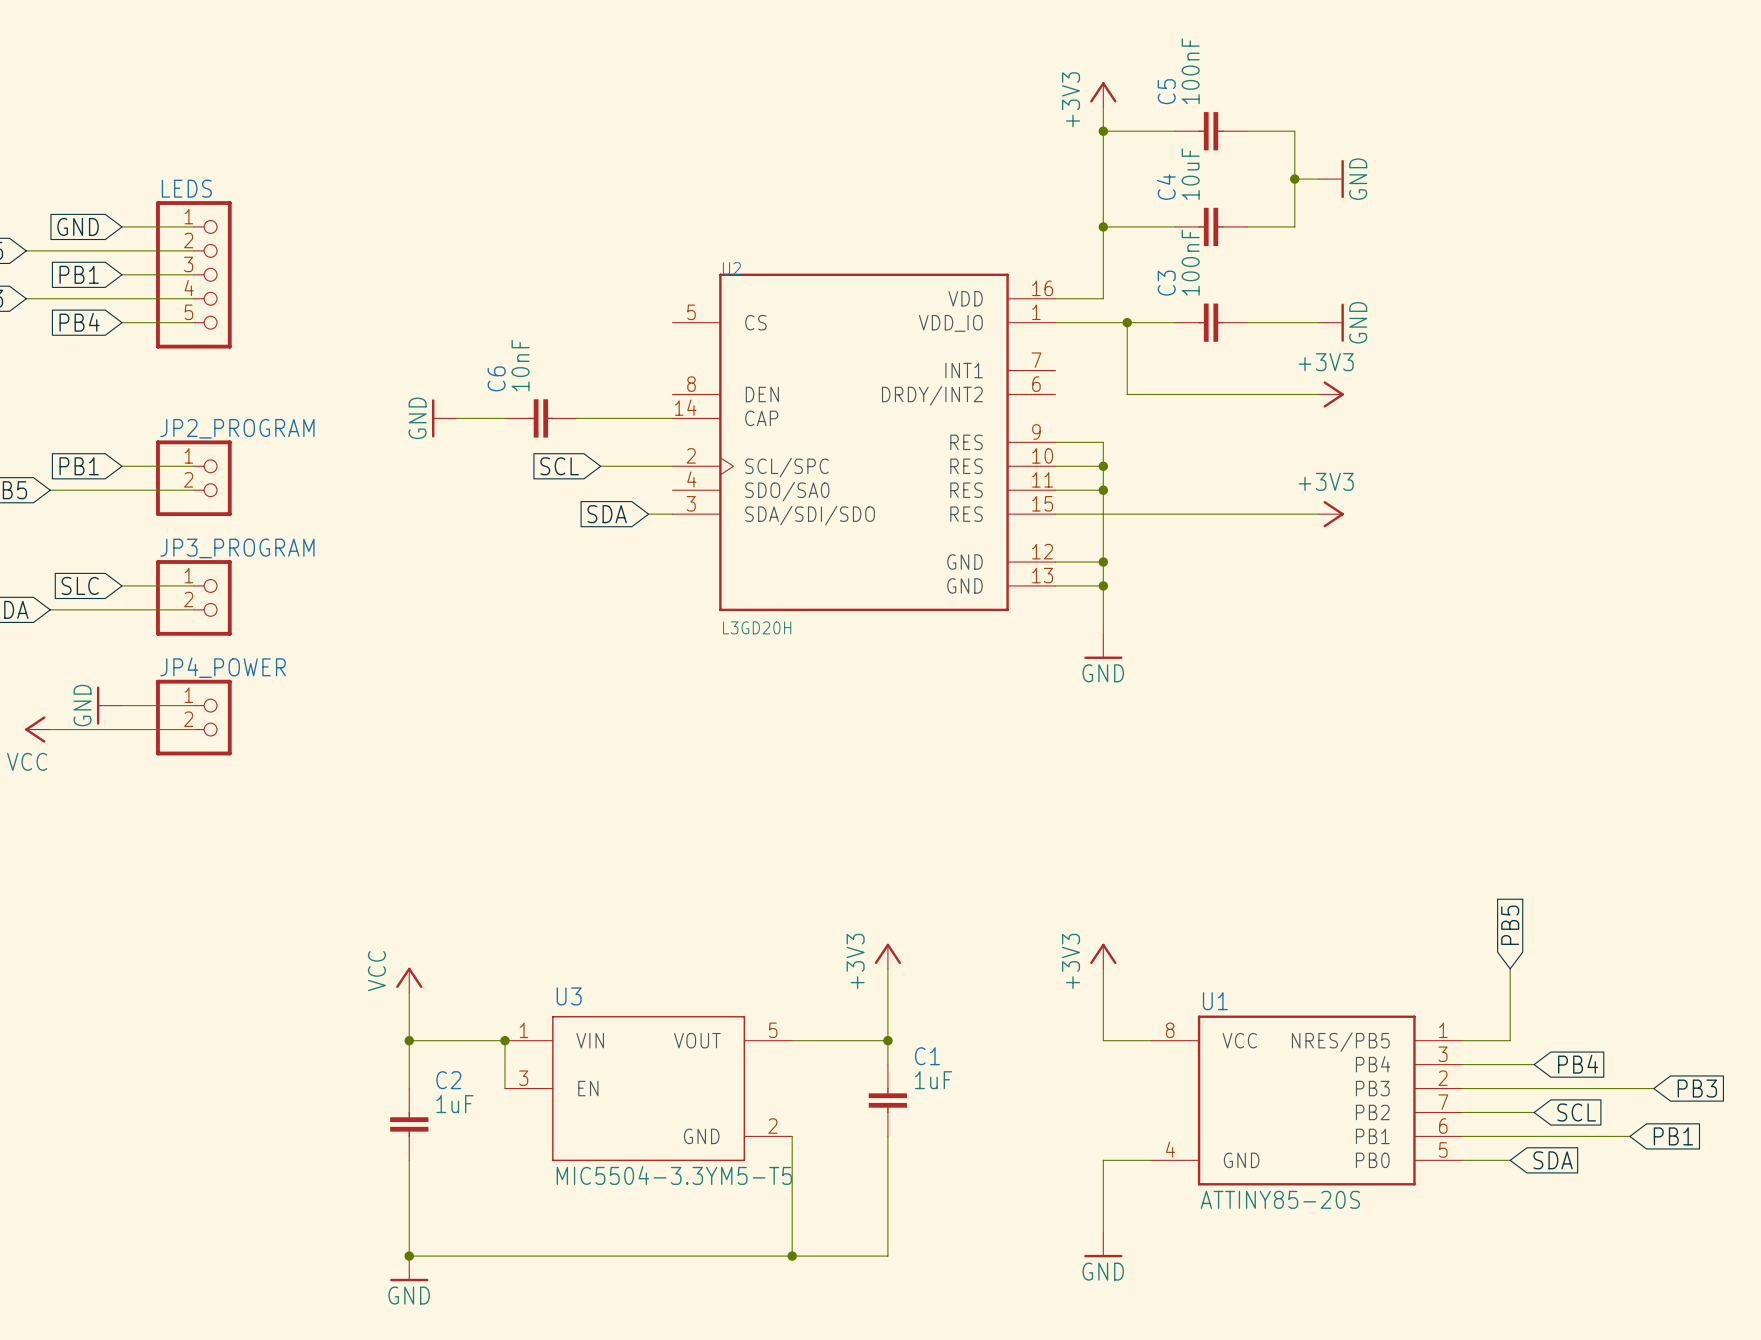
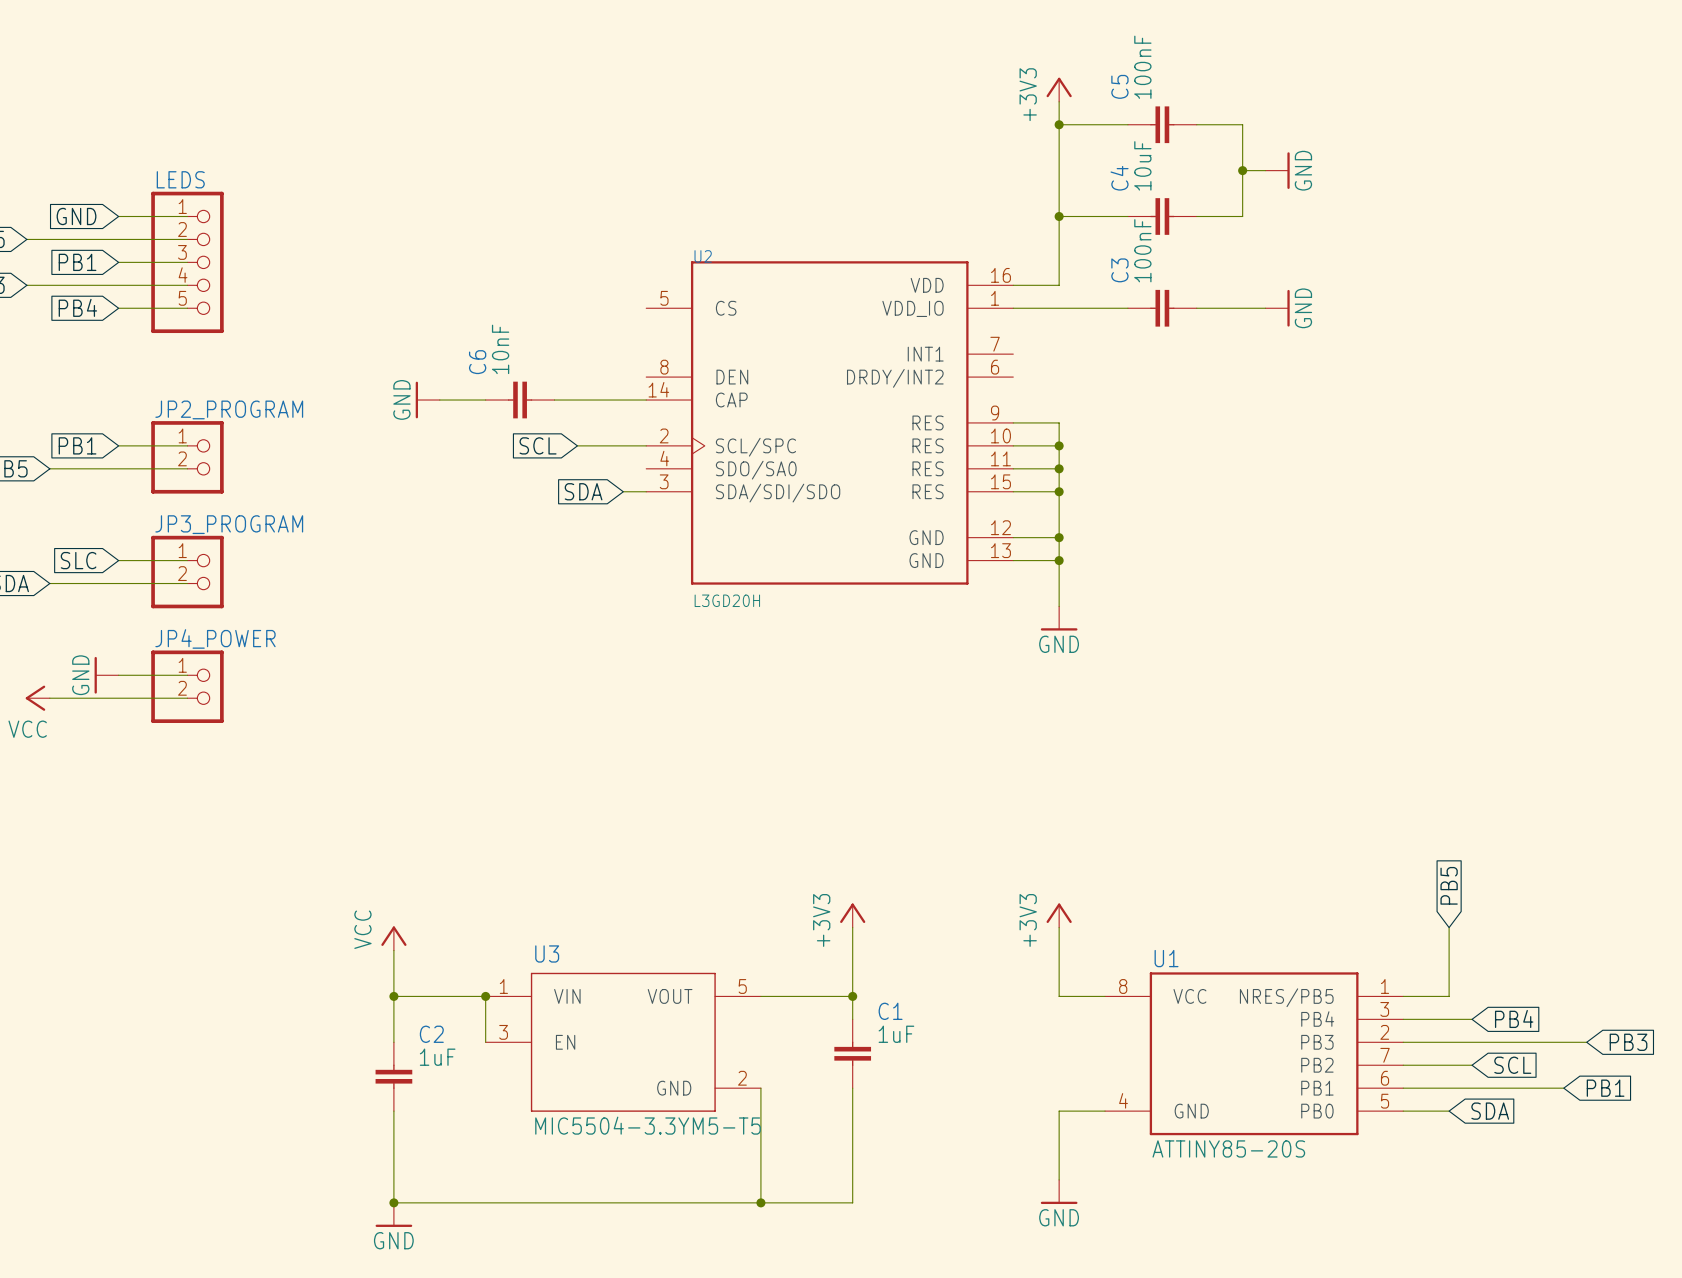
wire: (1127, 322) (1127, 394) (1318, 394) -> none
junction: (1127, 322) -> none
power symbol: +3V3 (1331, 394) -> none
wire: (1103, 514) (1318, 514) -> none
junction: none -> (1059, 491)
power symbol: +3V3 (1331, 514) -> none

